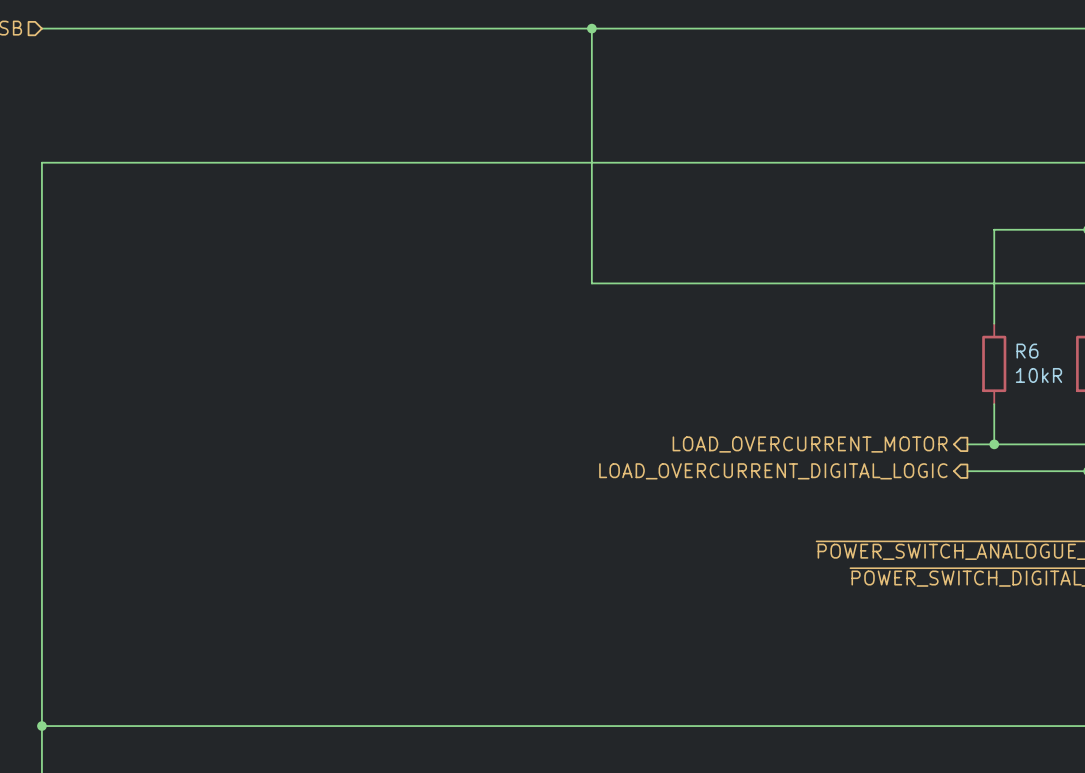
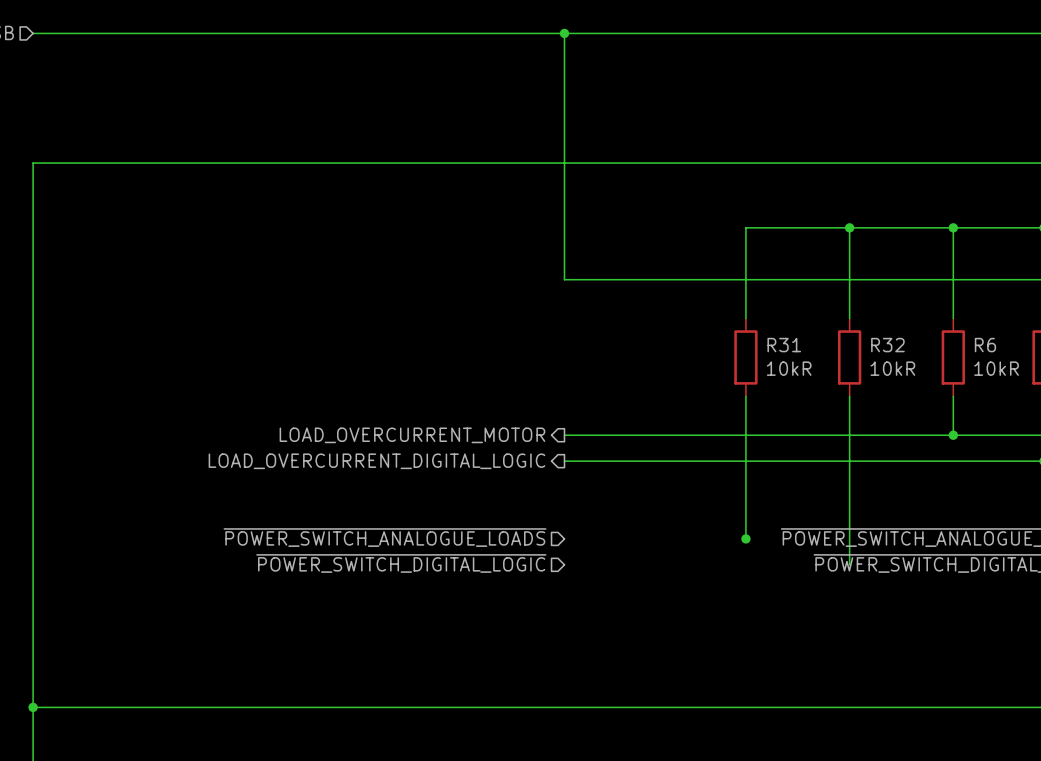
wire: none -> (849, 227) (849, 318)
junction: none -> (849, 227)
wire: none -> (953, 227) (745, 227) (745, 318)
junction: none -> (953, 227)
R31: none -> 10kR (745, 357)
R32: none -> 10kR (849, 357)
wire: none -> (745, 396) (745, 538)
wire: none -> (849, 396) (849, 564)
hierarchical label: none -> LOAD_OVERCURRENT_MOTOR (412, 435)
wire: none -> (564, 435) (927, 435)
hierarchical label: LOAD_OVERCURRENT_MOTOR (810, 444) -> none
hierarchical label: none -> LOAD_OVERCURRENT_DIGITAL_LOGIC (376, 461)
wire: none -> (564, 461) (927, 461)
hierarchical label: LOAD_OVERCURRENT_DIGITAL_LOGIC (773, 471) -> none
hierarchical label: none -> ~{POWER_SWITCH_ANALOGUE_LOADS} (385, 537)
junction: none -> (745, 538)
hierarchical label: none -> ~{POWER_SWITCH_DIGITAL_LOGIC} (401, 563)

